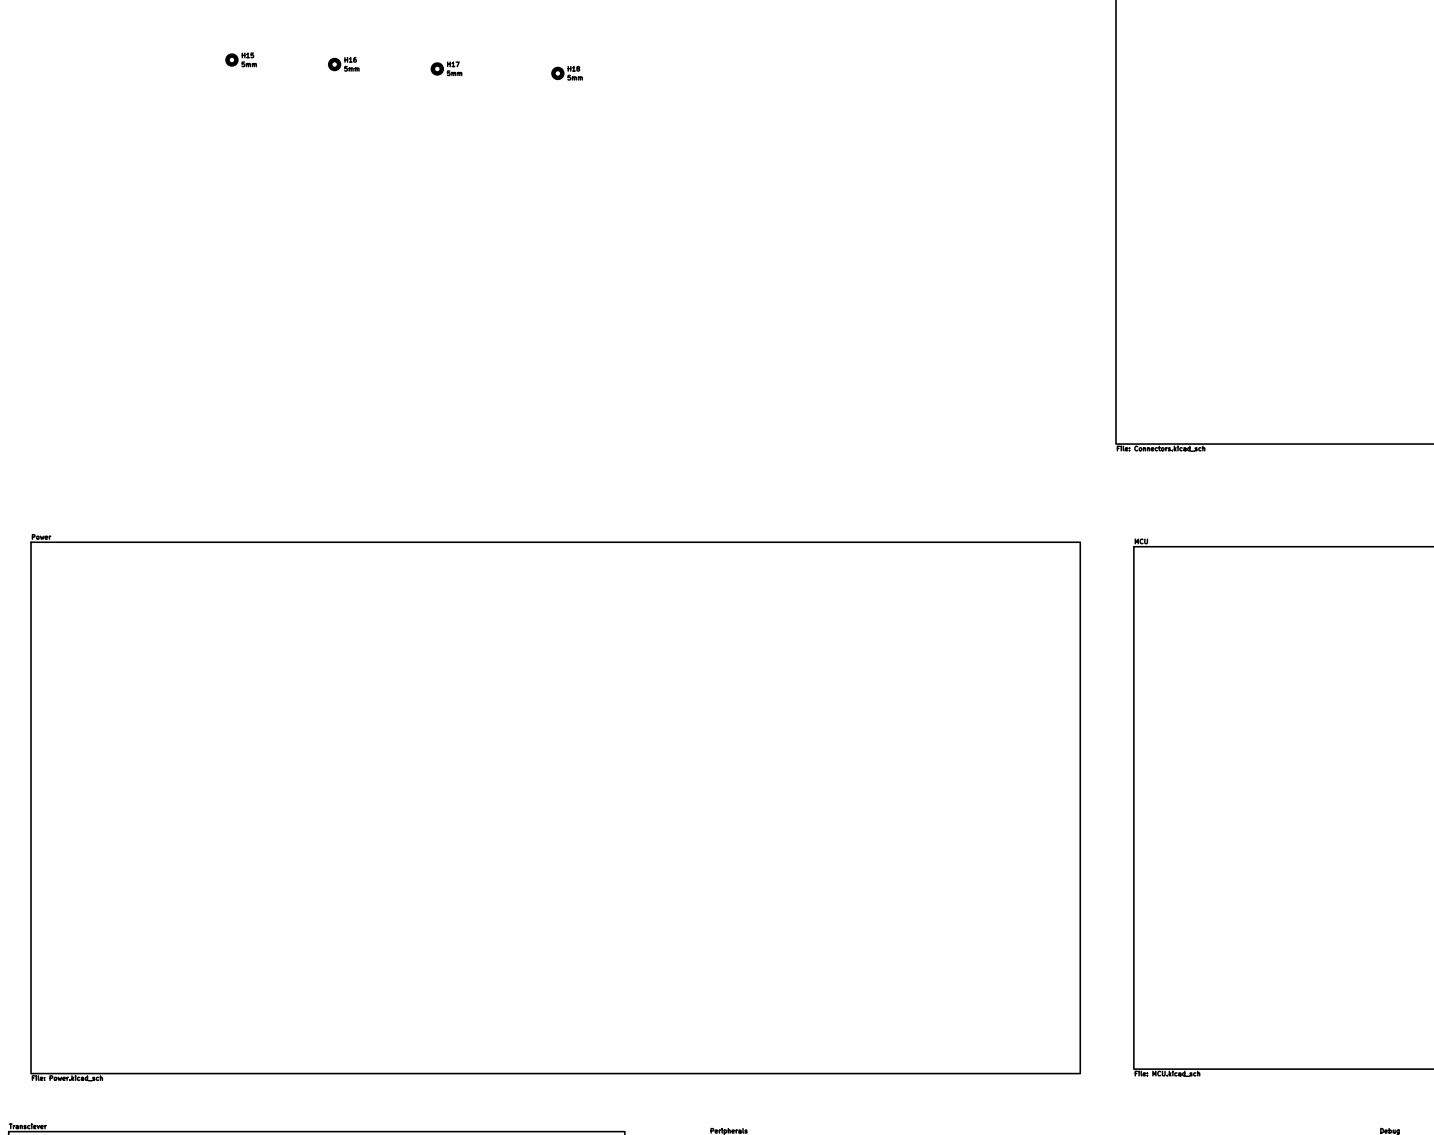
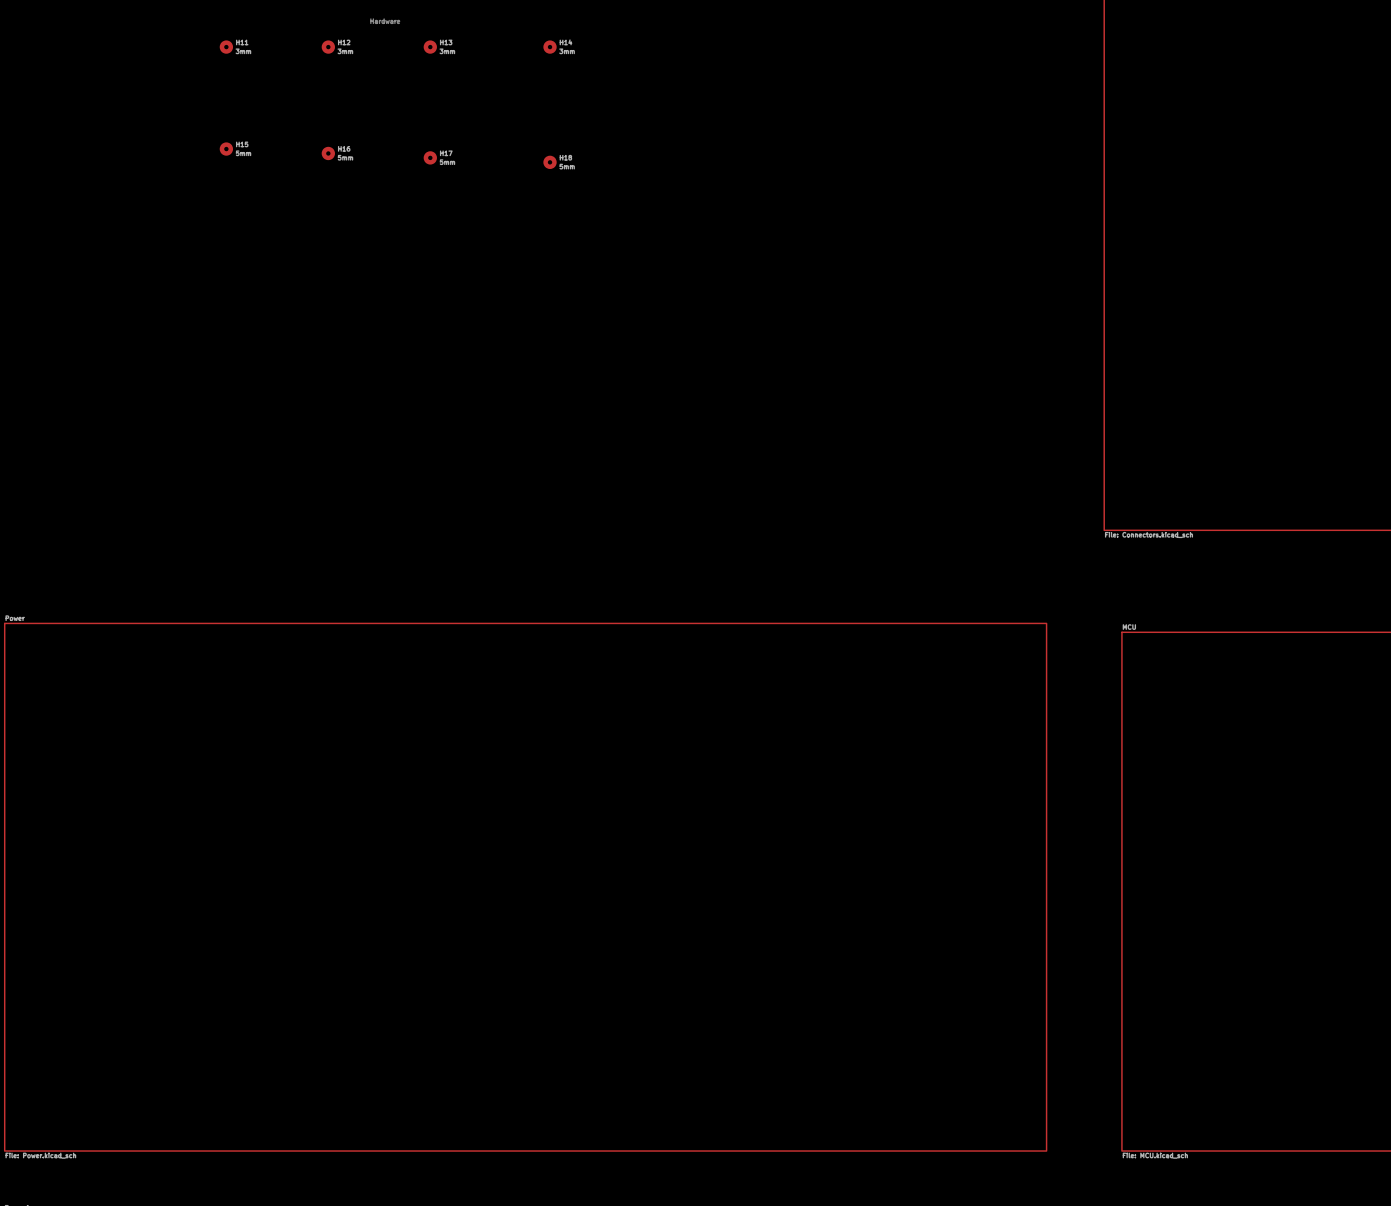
sheet position: (555, 807) -> (525, 887)

